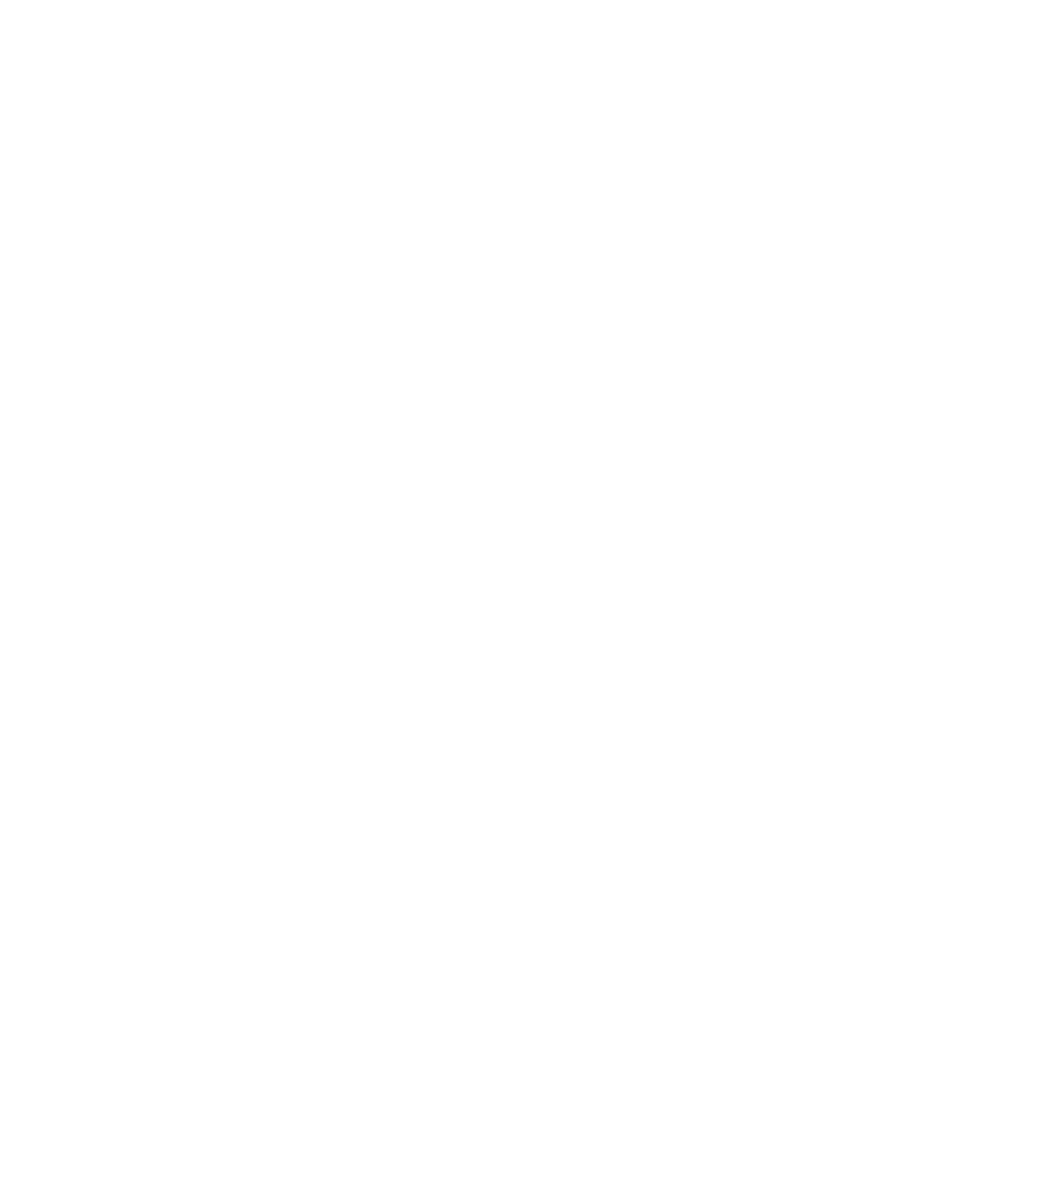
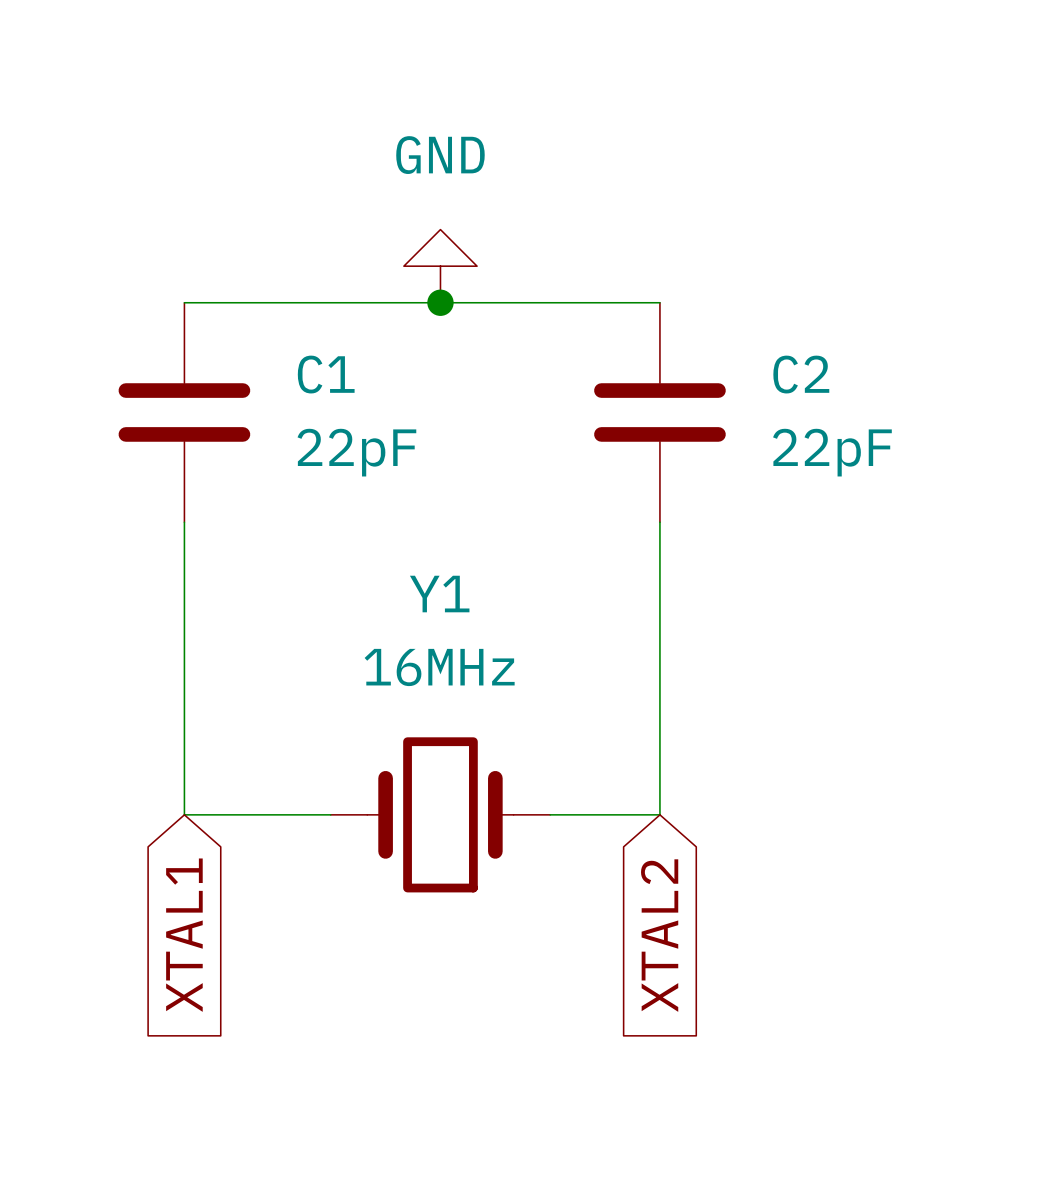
power symbol: none -> GND (440, 266)
wire: none -> (184, 302) (659, 302)
junction: none -> (440, 302)
C1: none -> 22pF (184, 412)
C2: none -> 22pF (659, 412)
wire: none -> (184, 522) (184, 814) (330, 814)
wire: none -> (659, 522) (659, 814) (550, 814)
Y1: none -> 16MHz (440, 814)
global label: none -> XTAL1 (184, 935)
global label: none -> XTAL2 (659, 935)

